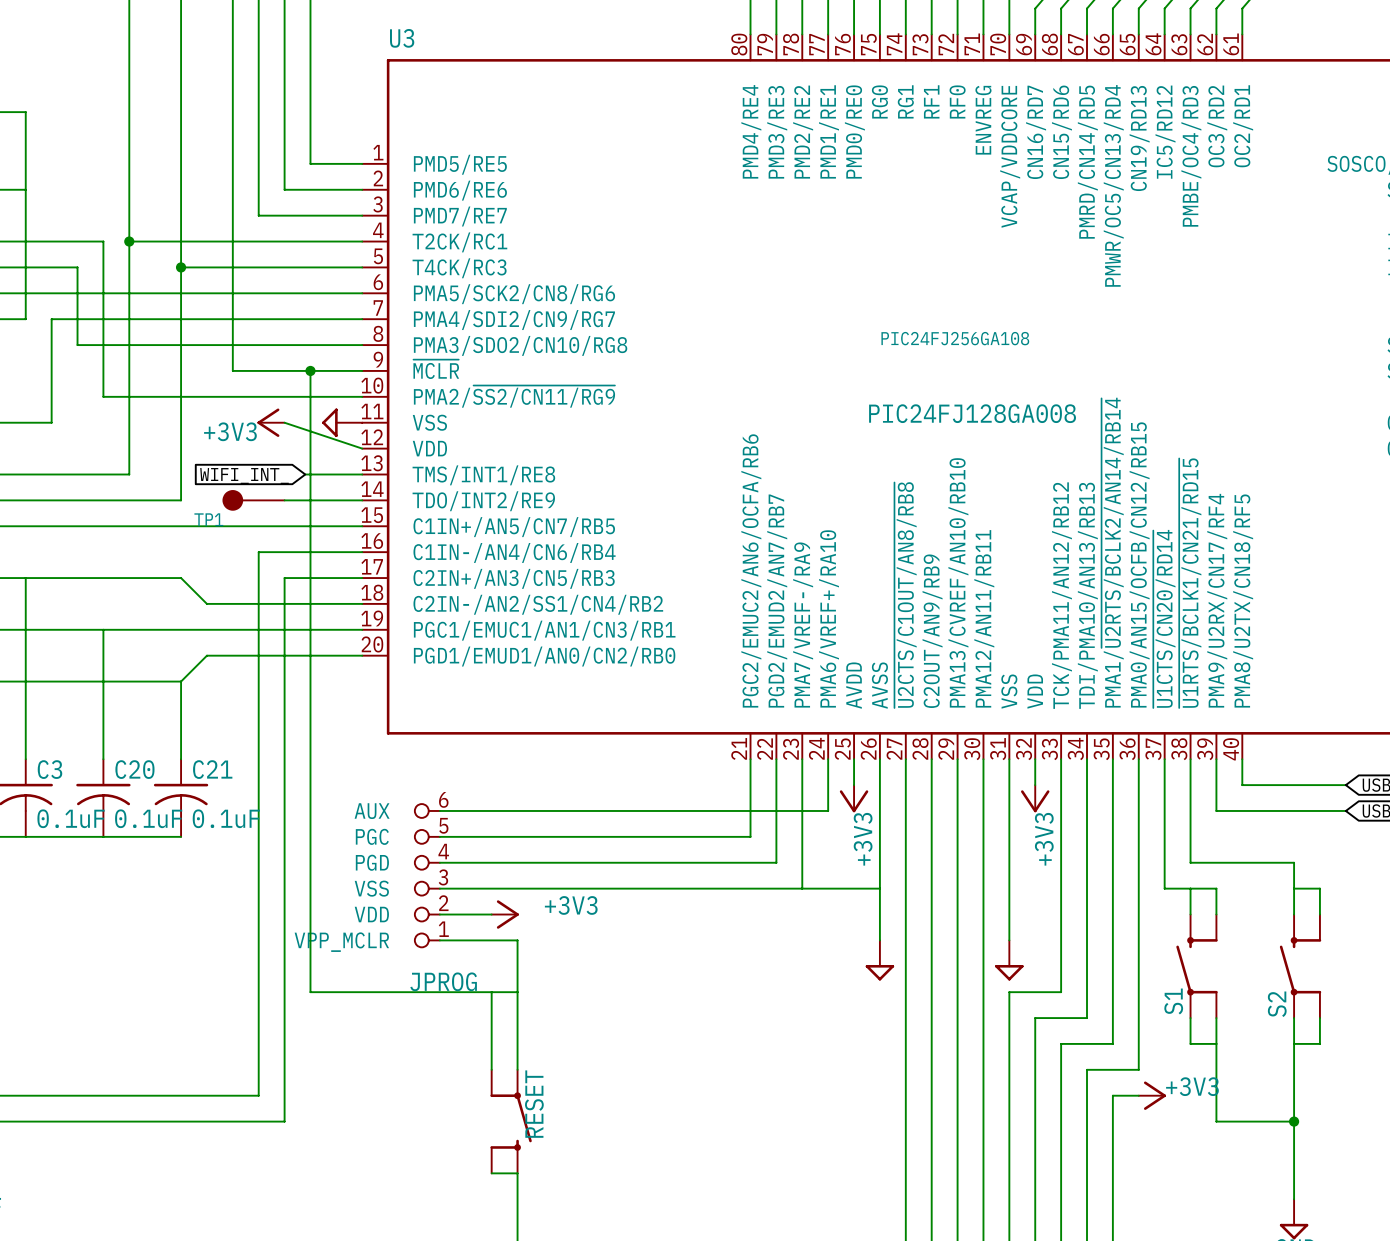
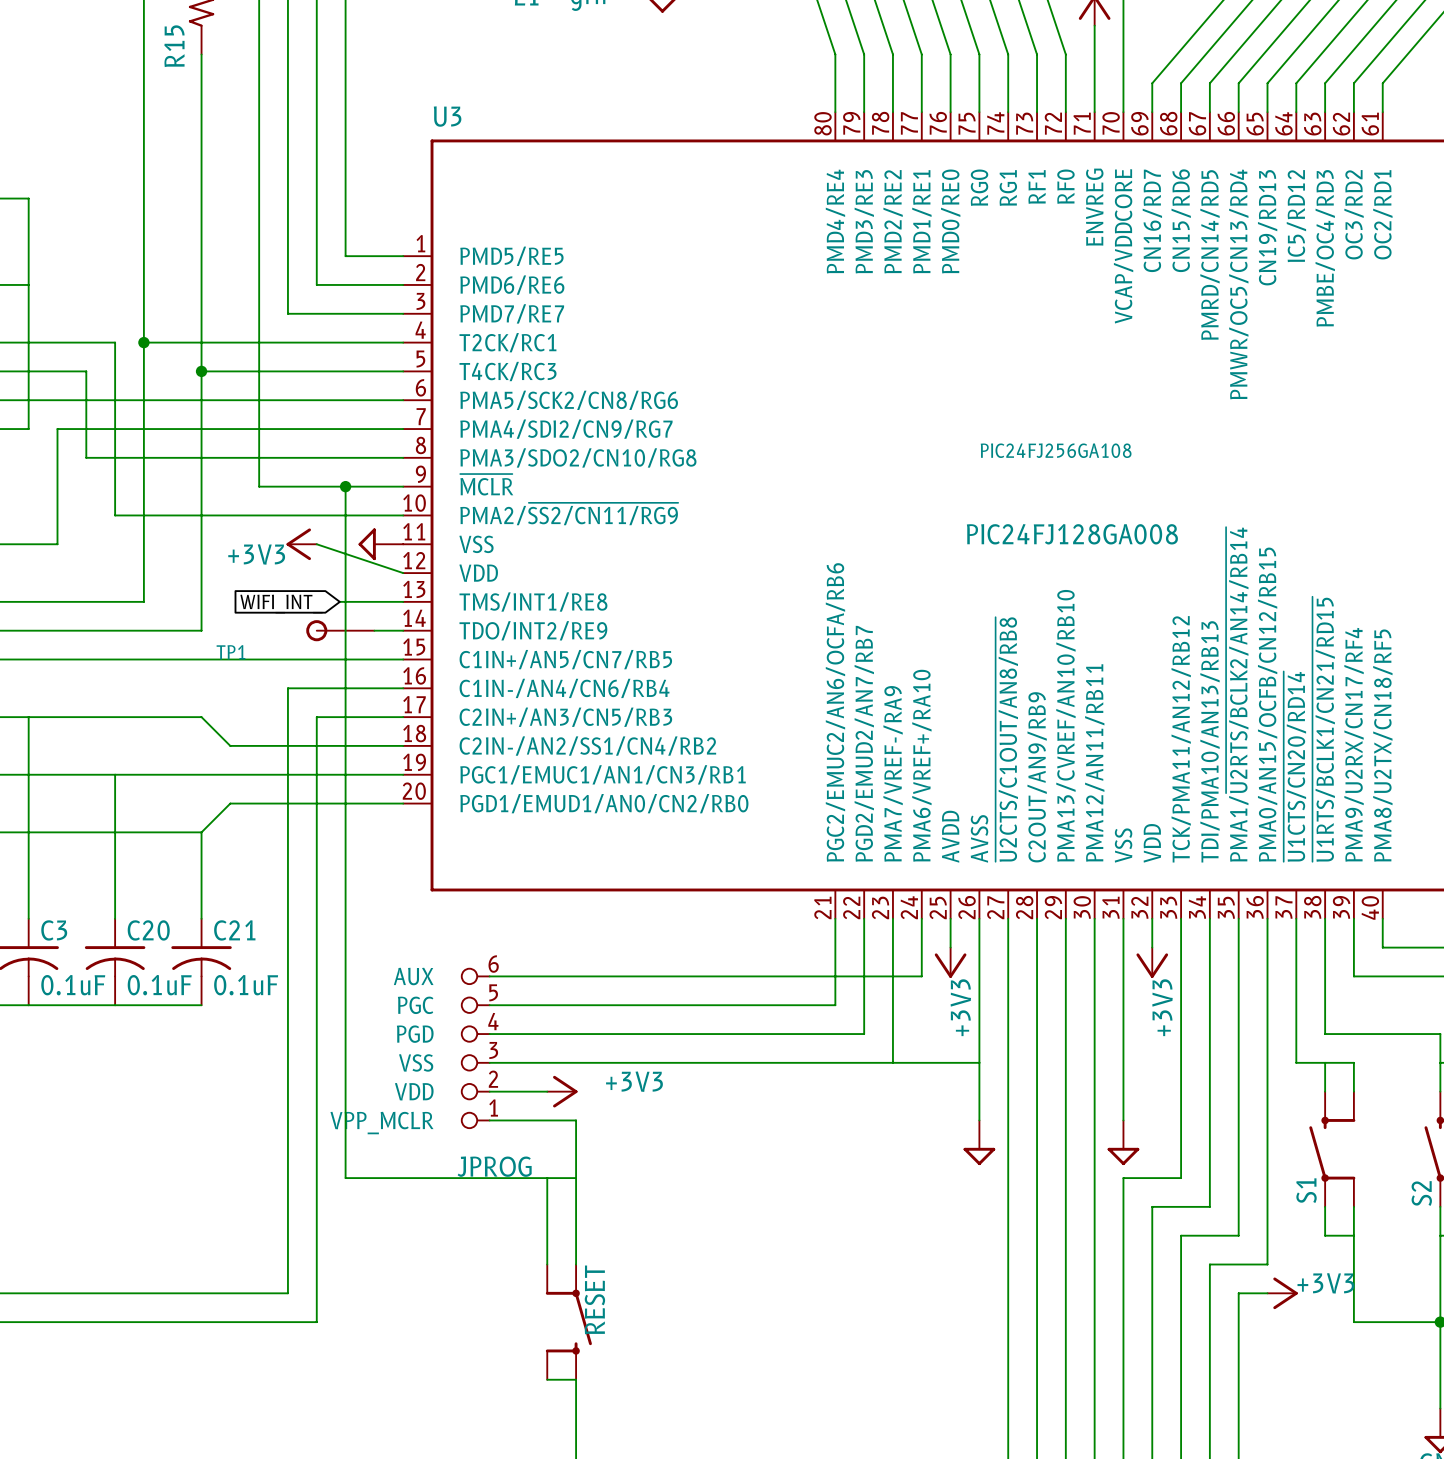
TP1 symbol: [222, 490, 285, 511] -> [306, 620, 375, 642]

